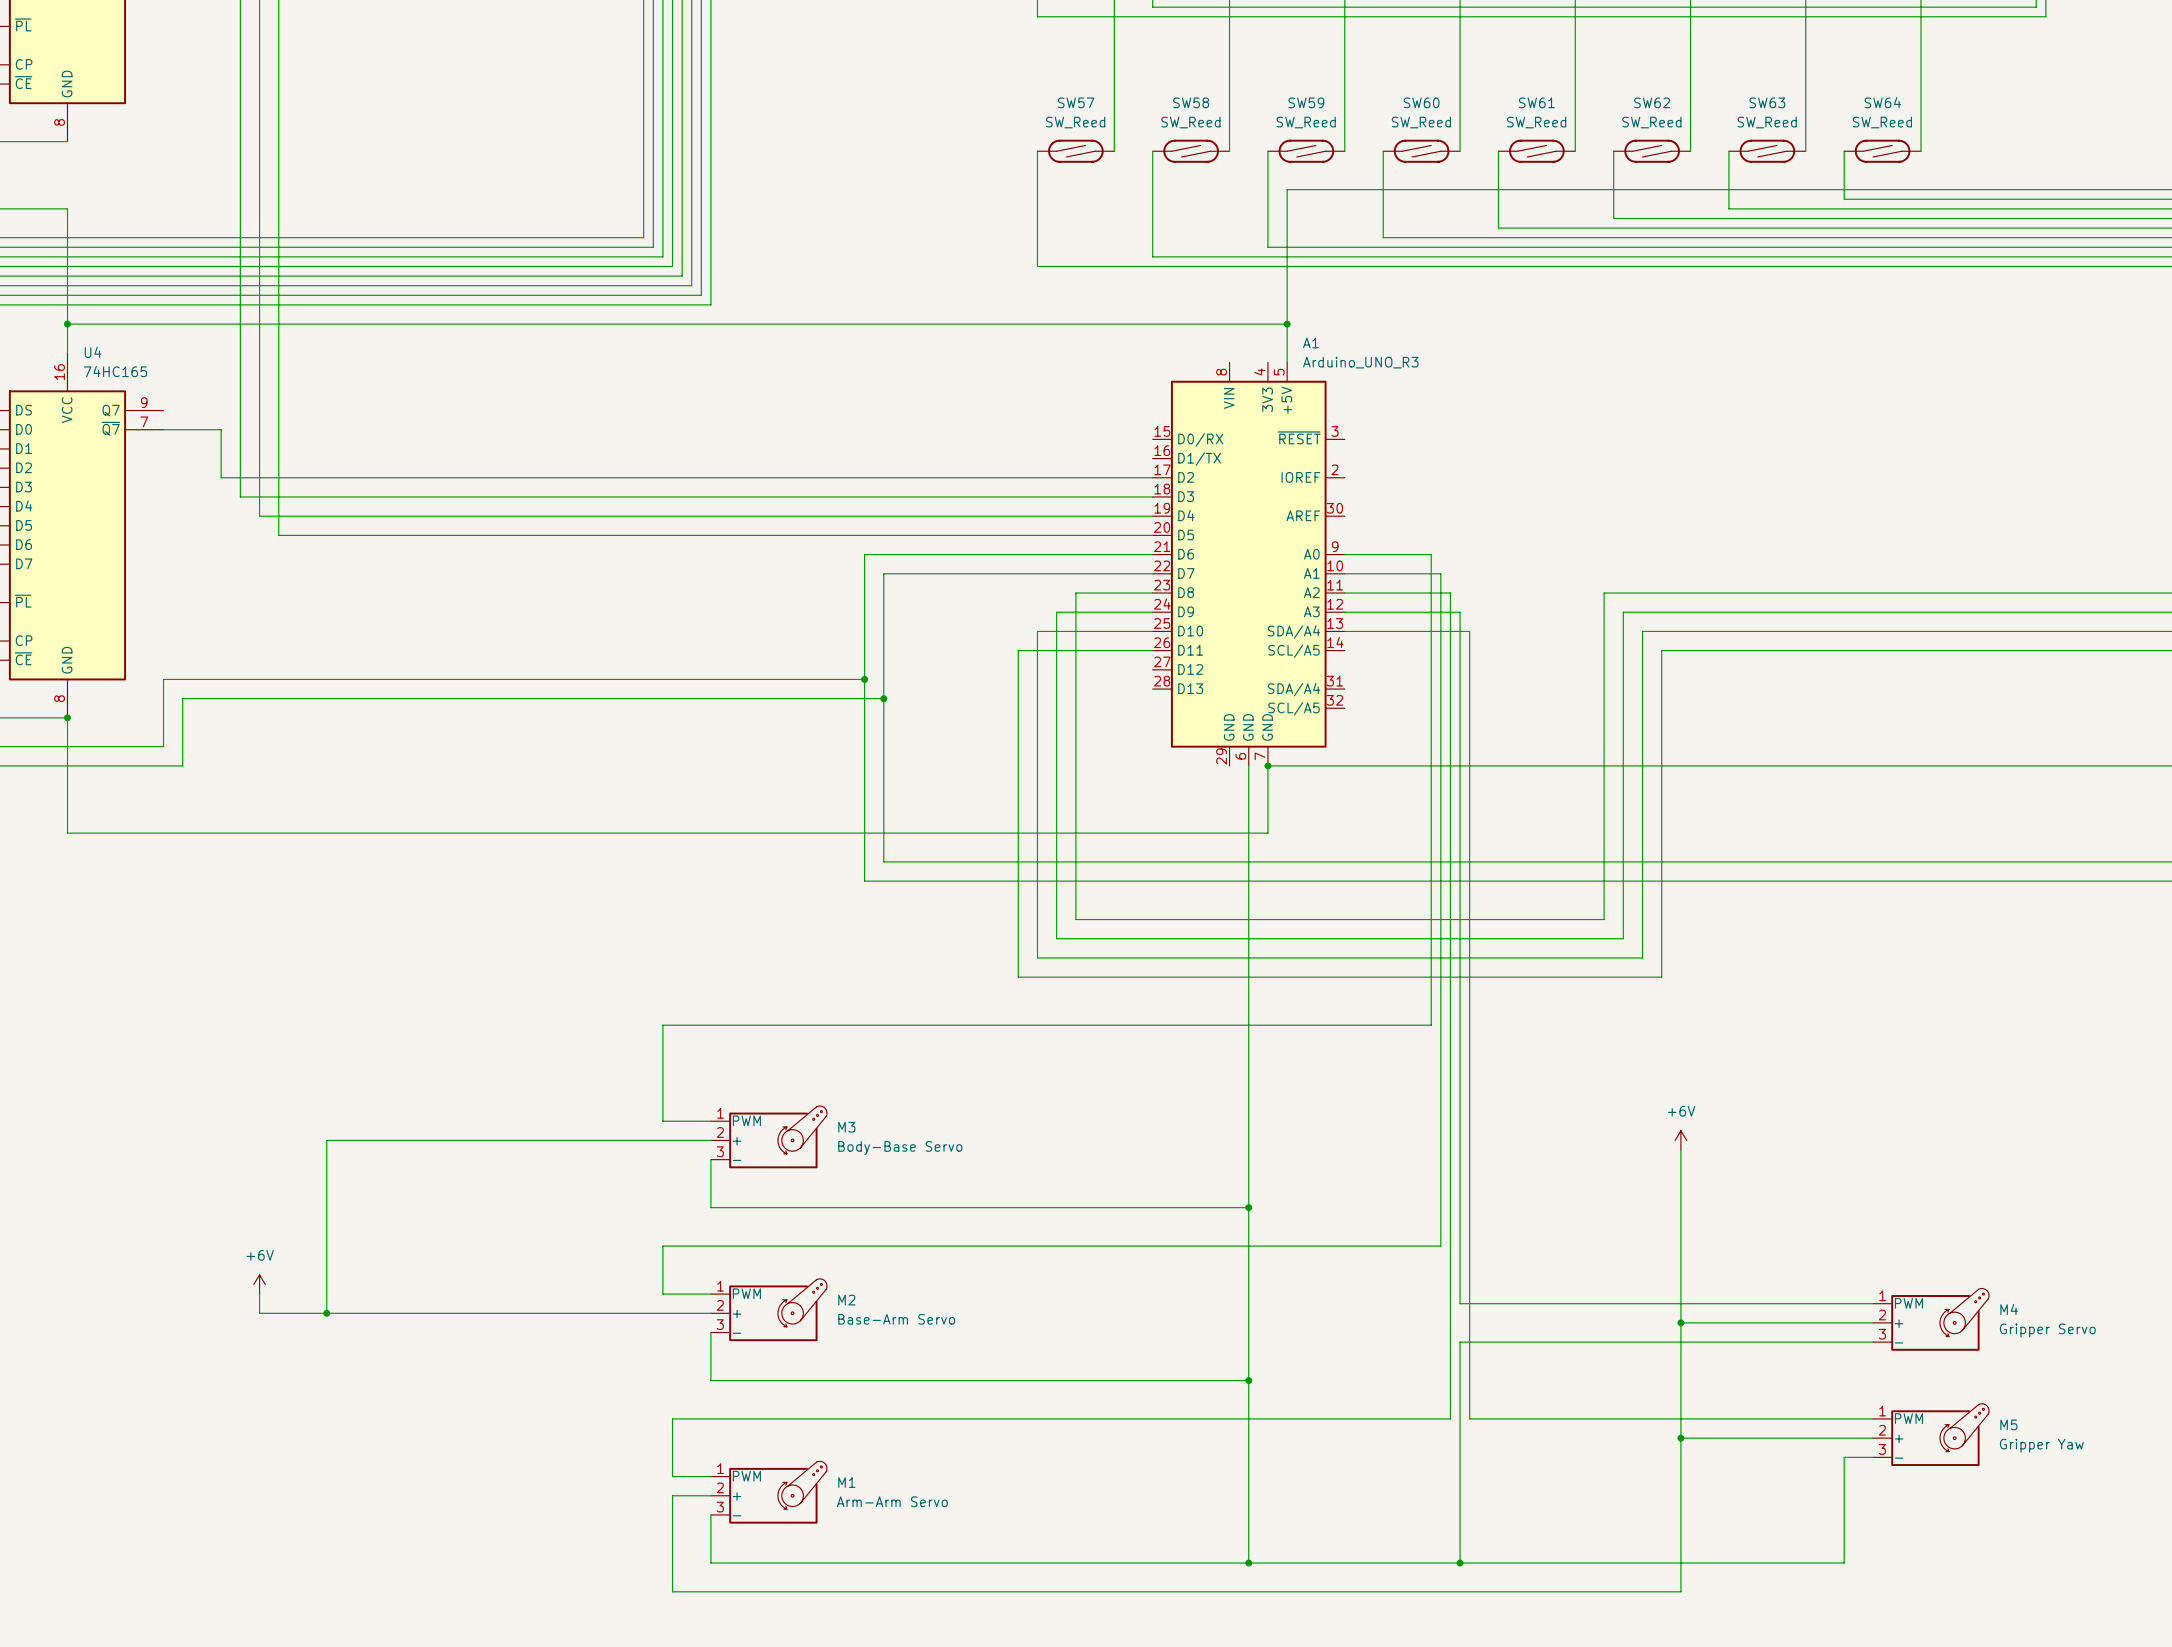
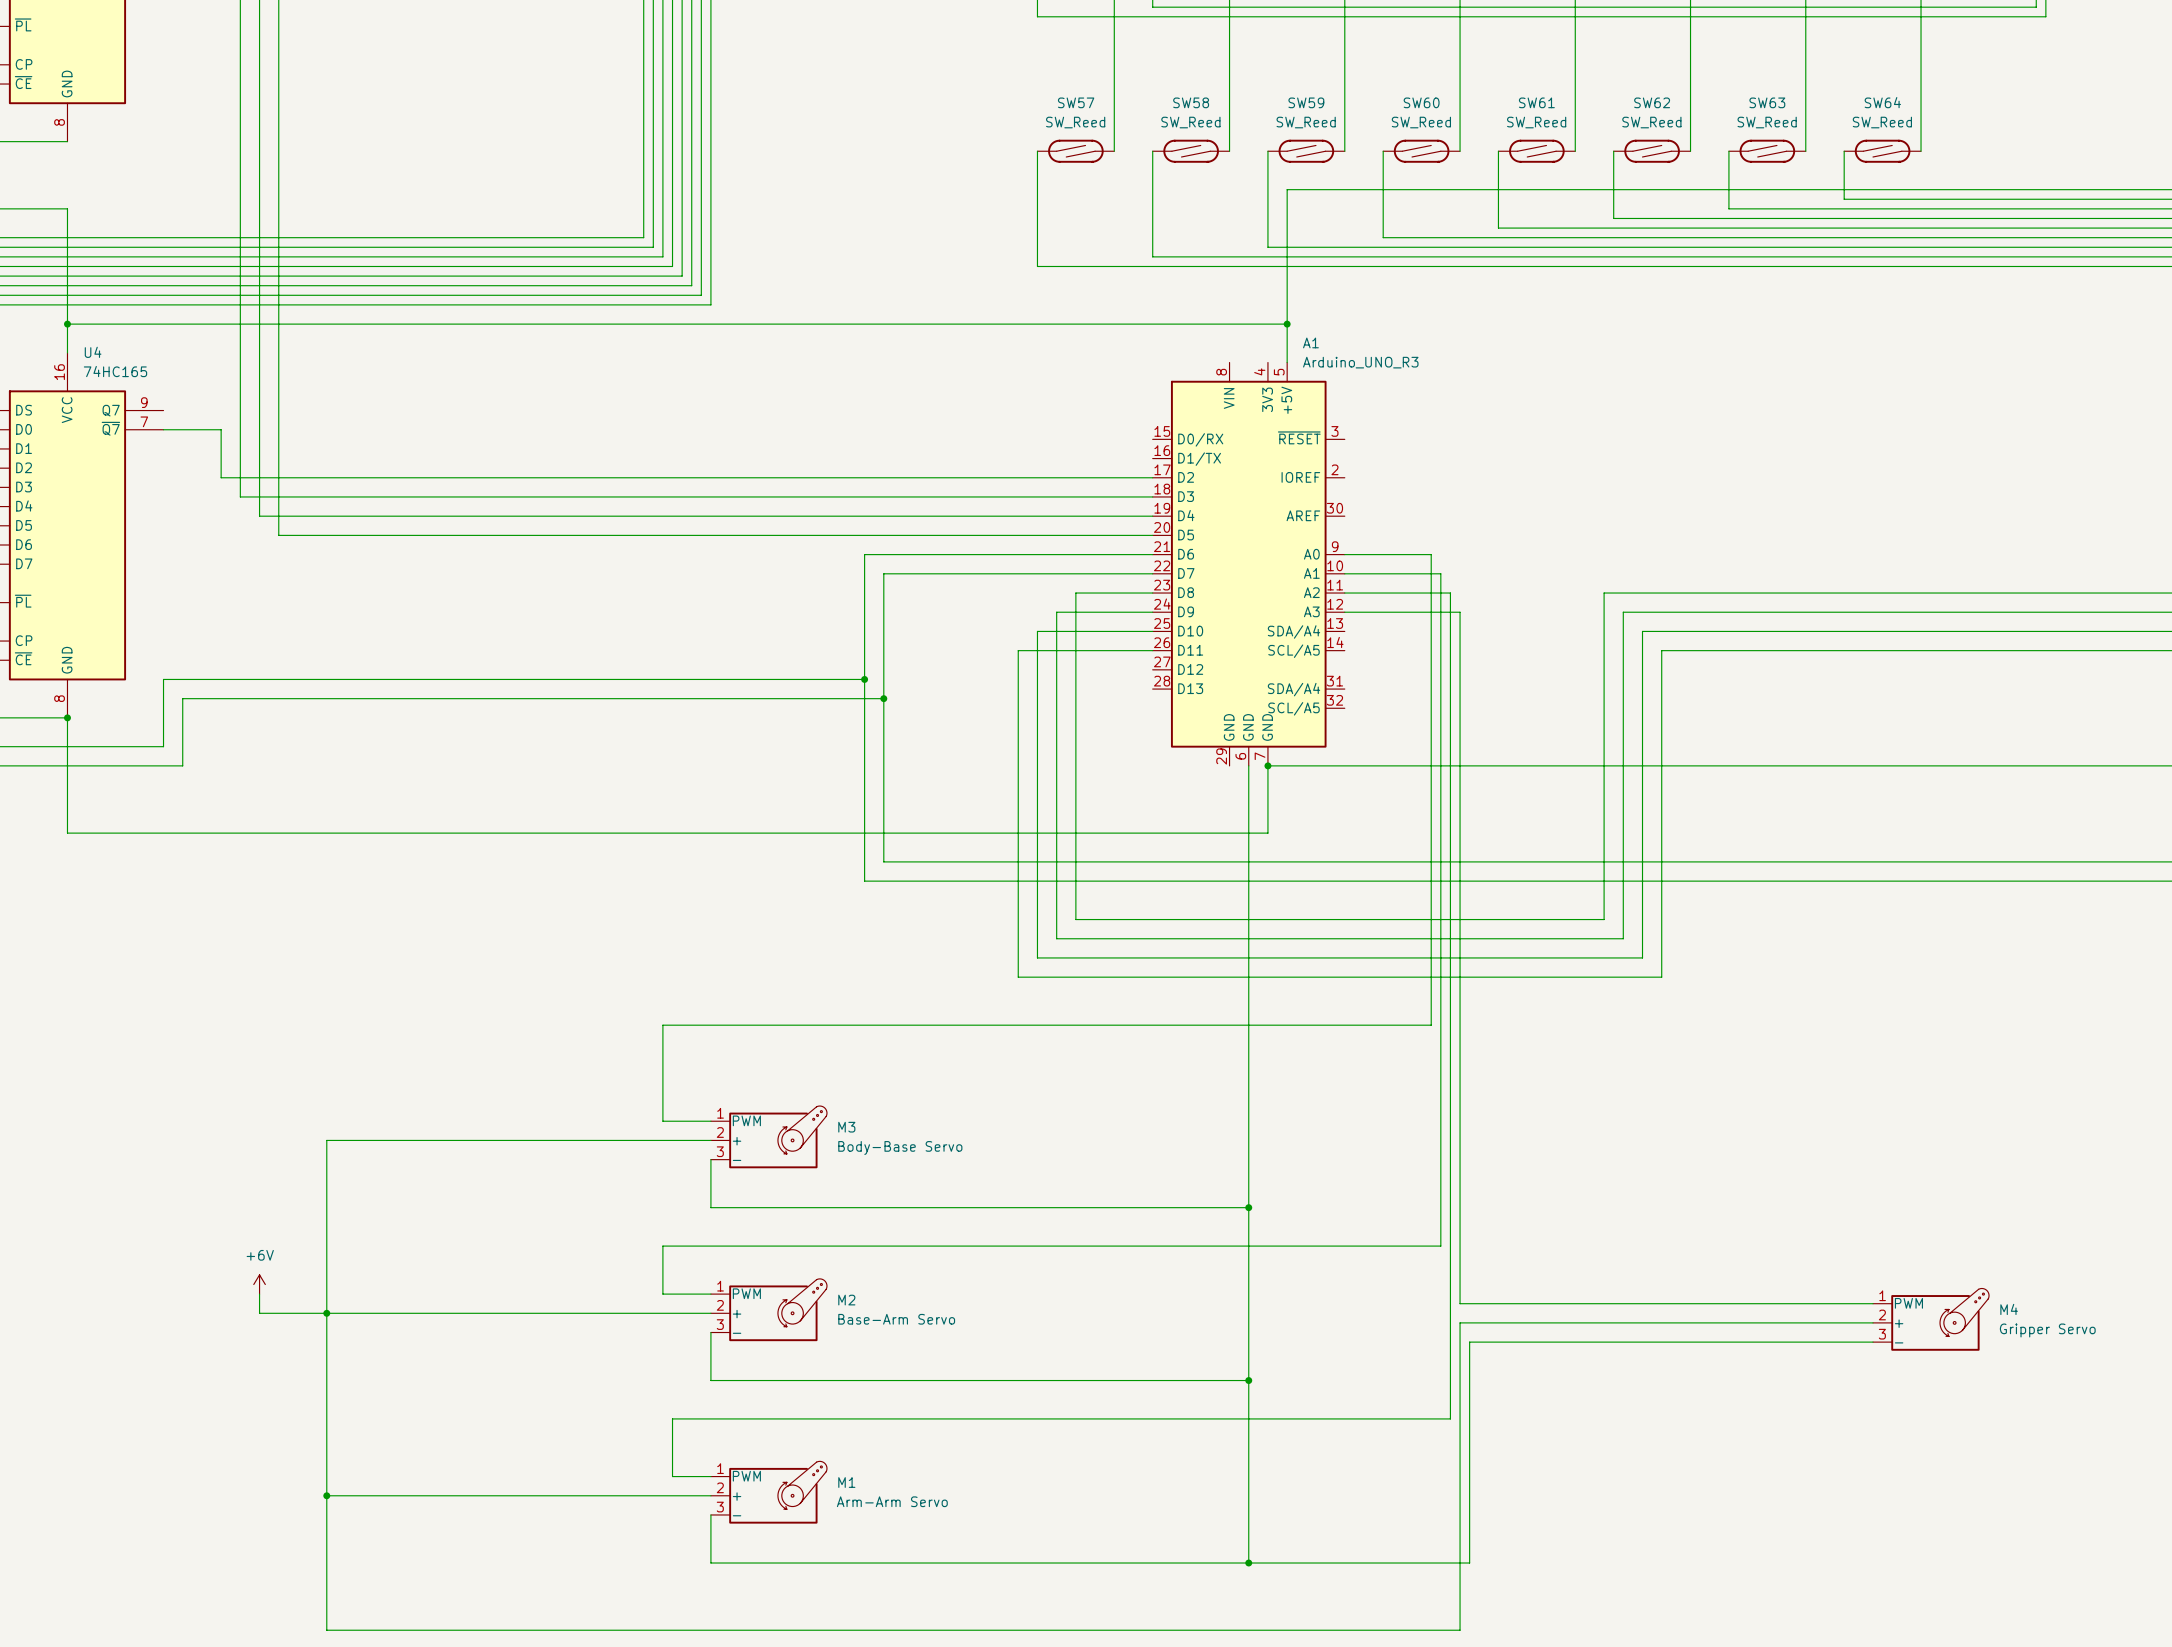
wire: (1344, 631) (1469, 631) (1469, 1342) (1460, 1342) -> (1680, 1322) (1460, 1322) (1460, 1342)
power symbol: +6V (1680, 1140) -> none
wire: (1680, 1150) (1680, 1591) (672, 1591) (672, 1495) -> (326, 1495) (672, 1495)
wire: none -> (326, 1313) (326, 1630) (1460, 1630) (1460, 1563)
junction: (1680, 1322) -> none
wire: (1469, 1418) (1873, 1418) -> none
M5: Gripper Yaw (1931, 1434) -> none
wire: (1680, 1438) (1873, 1438) -> none
junction: (1680, 1438) -> none
wire: (1873, 1457) (1844, 1457) (1844, 1563) (1469, 1563) -> (1469, 1418) (1469, 1563)
junction: none -> (326, 1495)
junction: (1460, 1563) -> none

